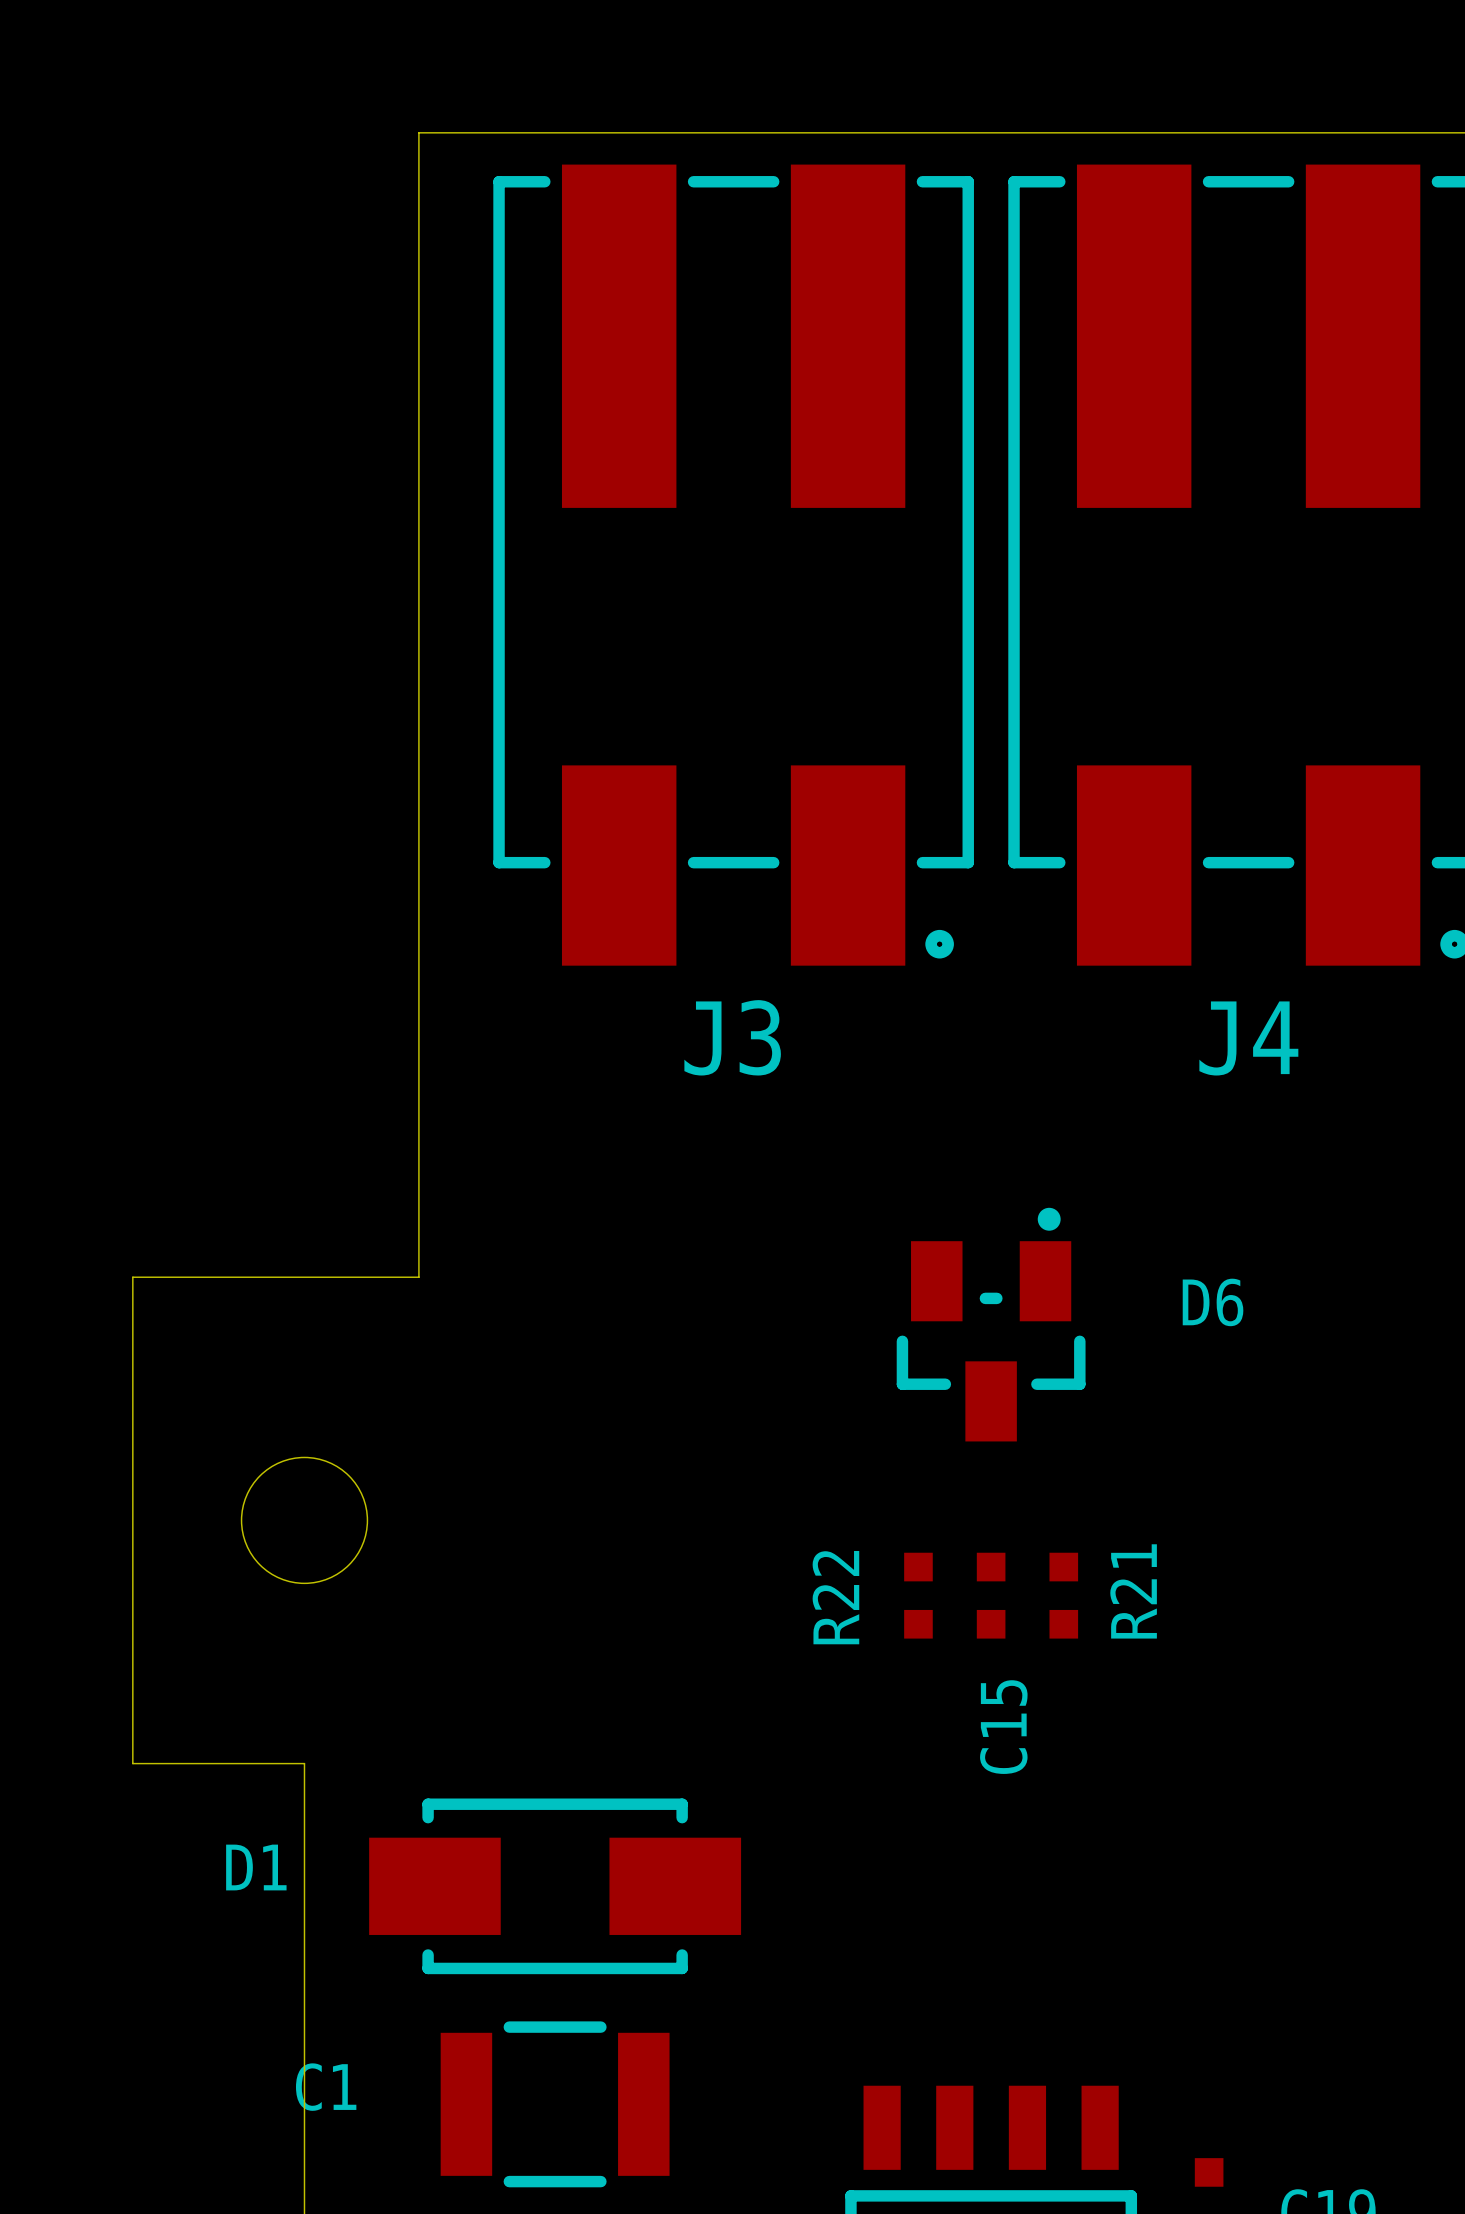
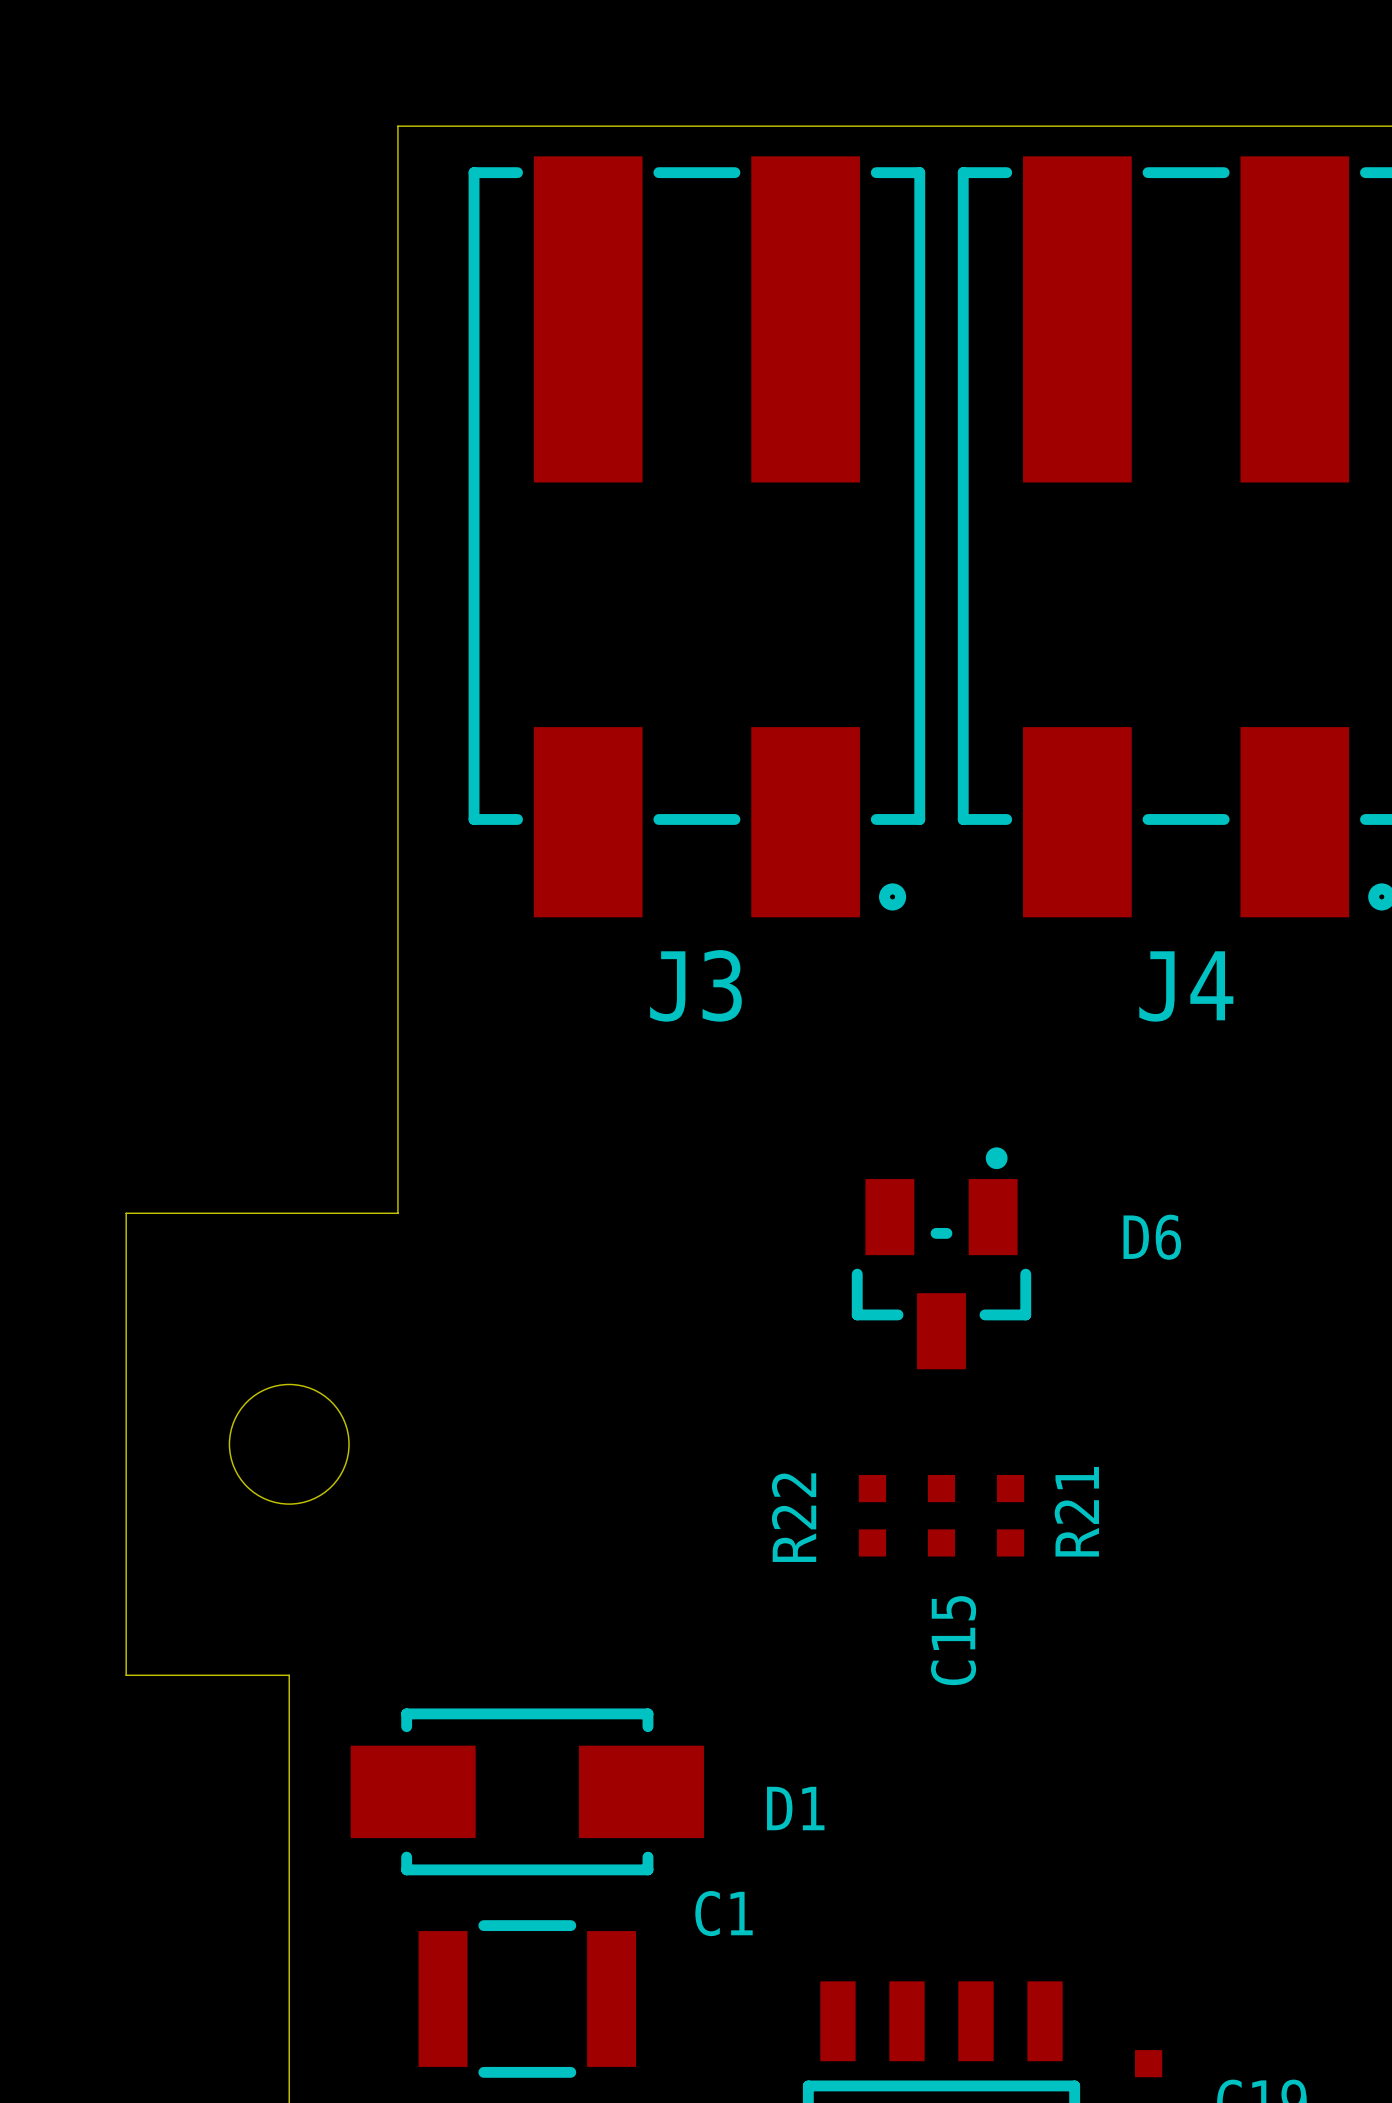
D1 name position: D1 (256, 1867) -> D1 (795, 1808)
C1 name position: C1 (326, 2087) -> C1 (724, 1913)

